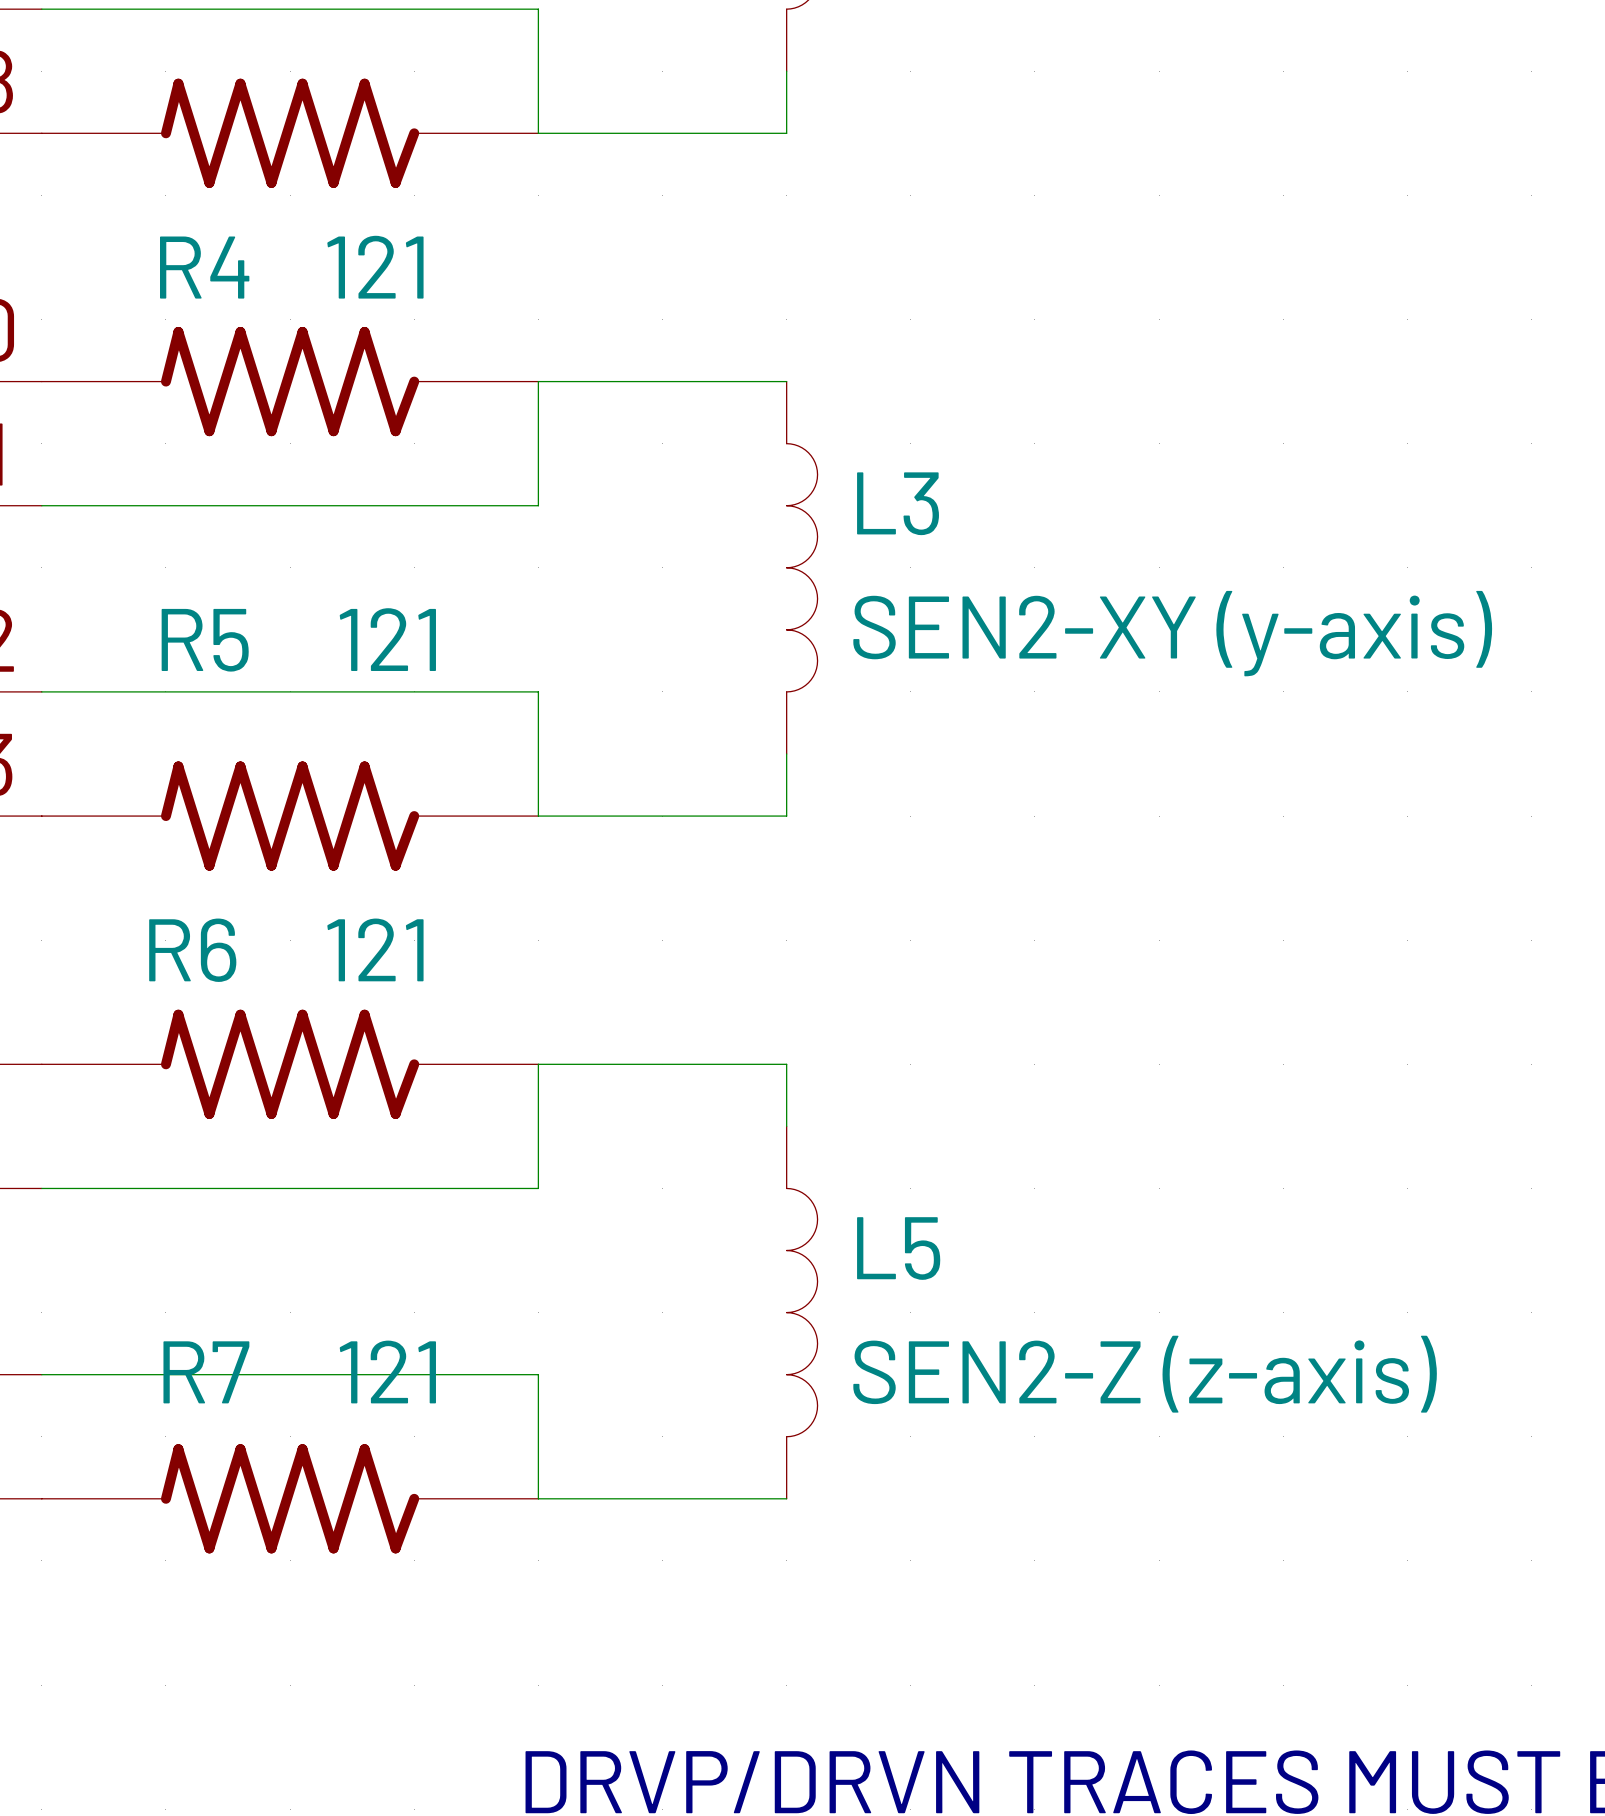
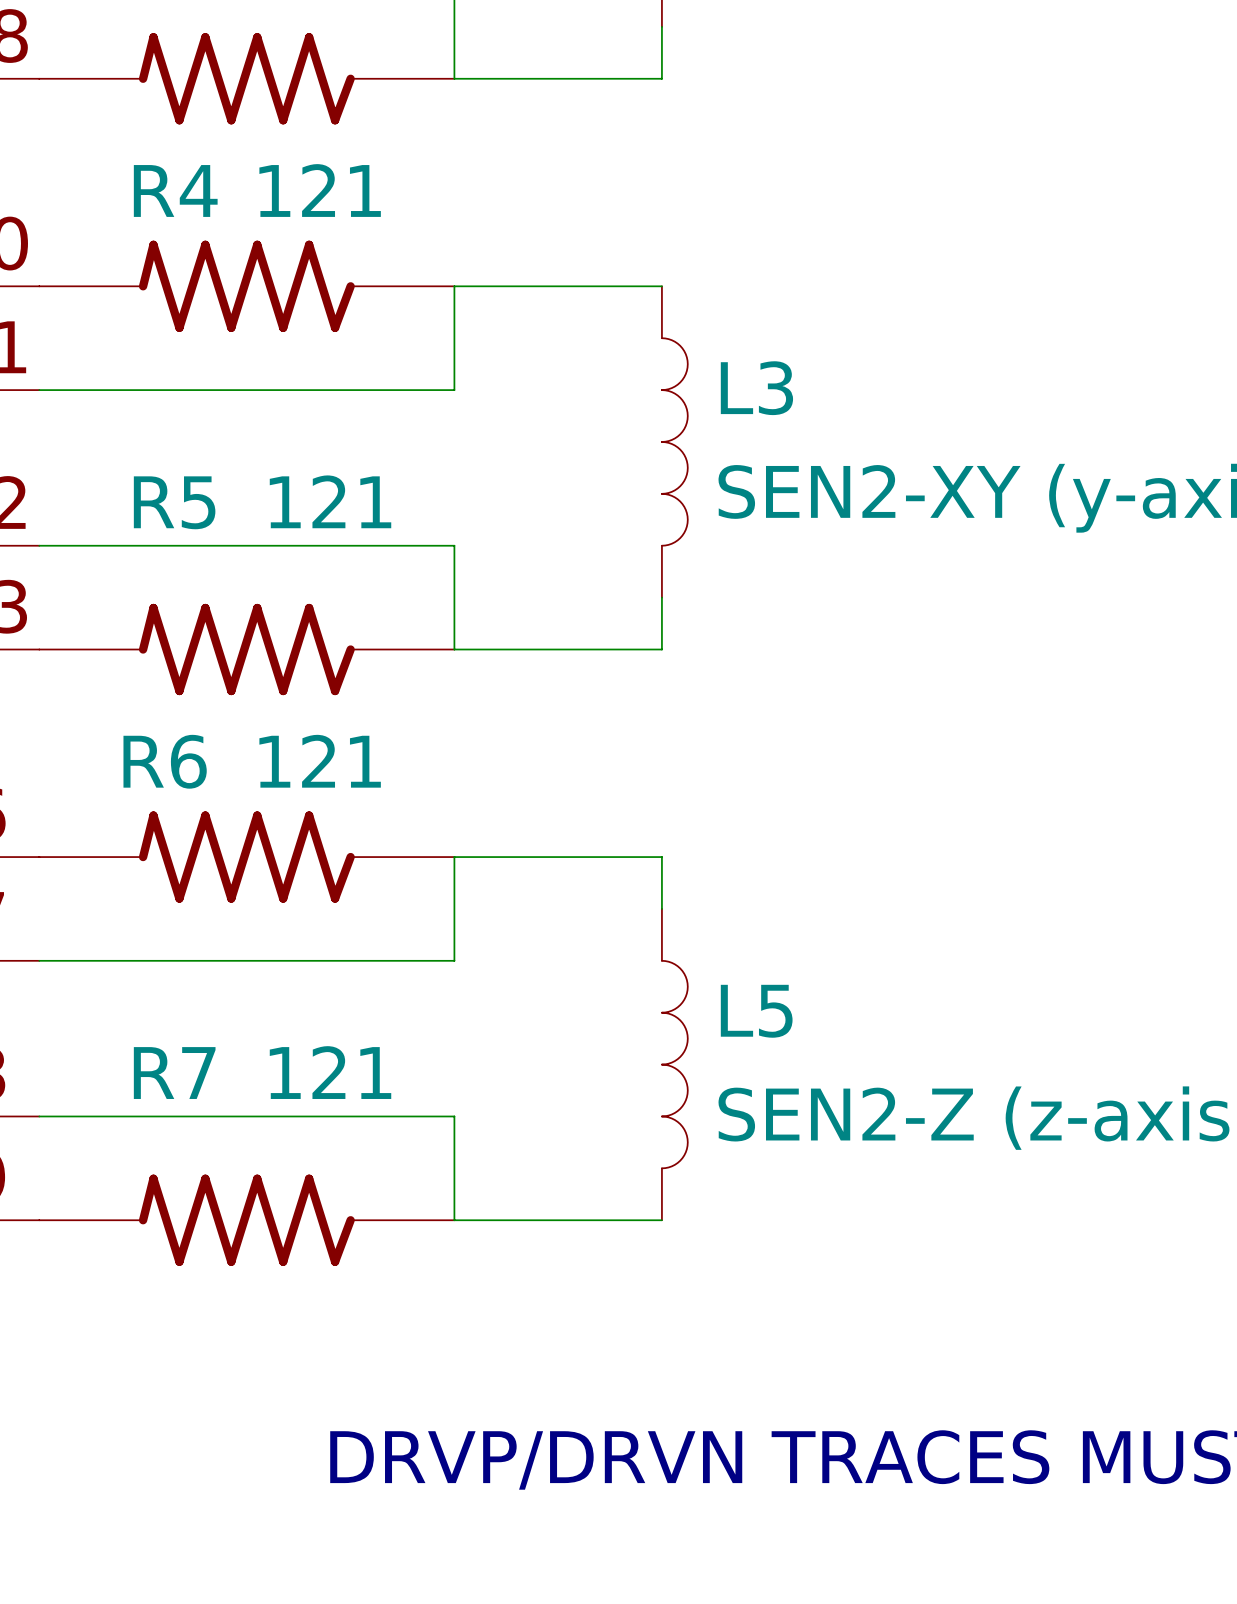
R7 value position: 121 (387, 1371) -> 121 (330, 1072)
R7 name position: R7 (206, 1372) -> R7 (174, 1073)

